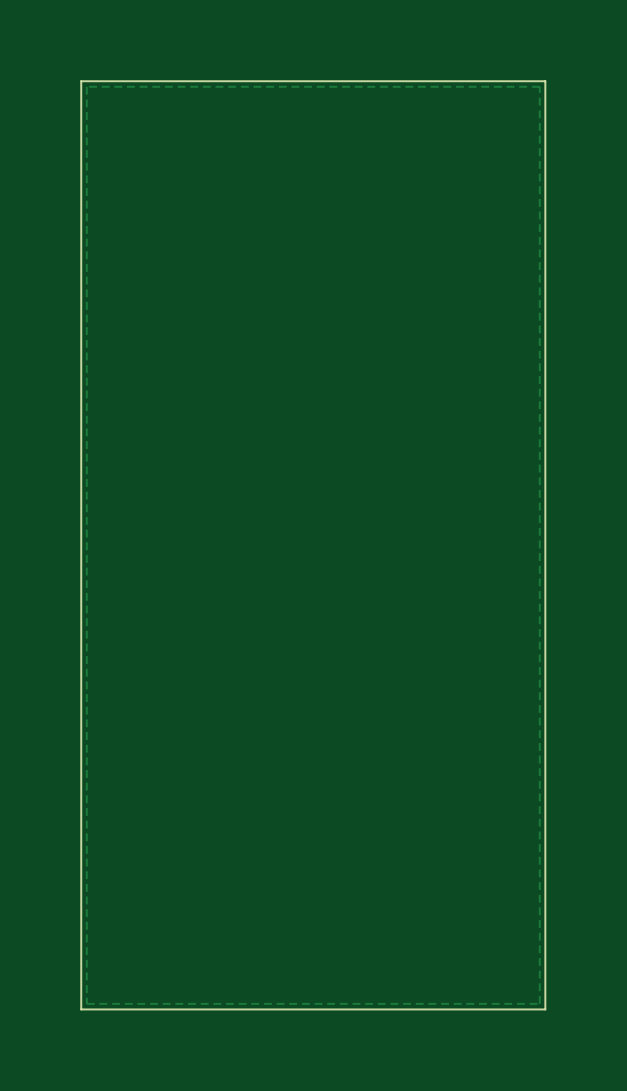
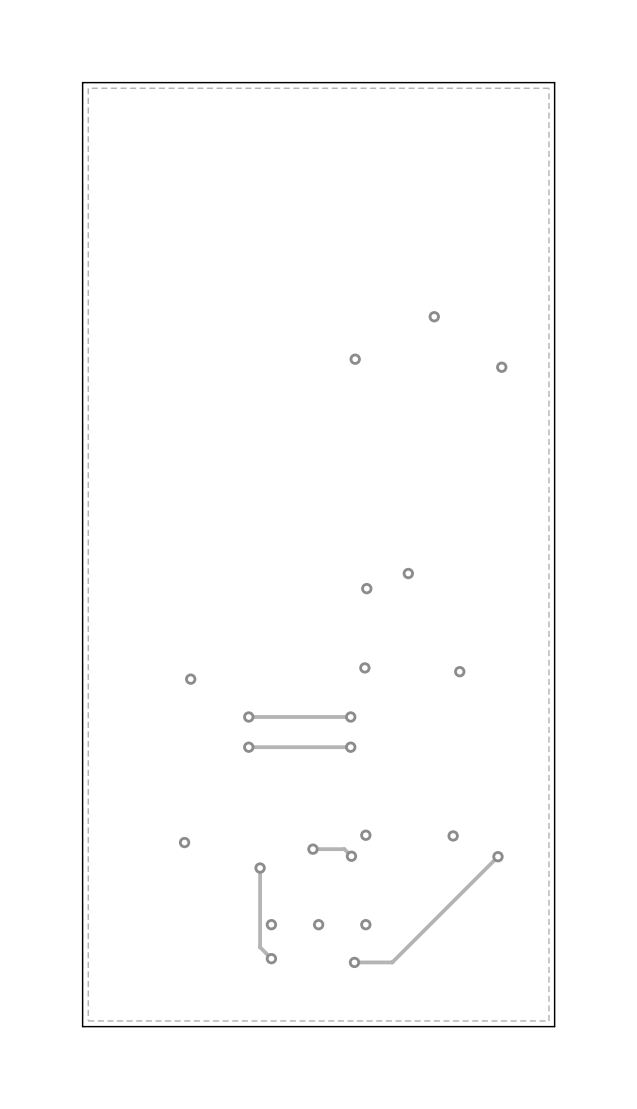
via: none -> (434, 316)
via: none -> (355, 359)
via: none -> (501, 367)
via: none -> (408, 573)
via: none -> (366, 588)
via: none -> (364, 667)
via: none -> (459, 671)
via: none -> (190, 679)
via: none -> (248, 716)
track: none -> (350, 716) (248, 716)
via: none -> (350, 716)
via: none -> (248, 747)
track: none -> (350, 747) (248, 747)
via: none -> (350, 747)
via: none -> (365, 835)
via: none -> (453, 835)
via: none -> (184, 842)
track: none -> (312, 849) (344, 849) (351, 856)
via: none -> (312, 849)
via: none -> (351, 856)
track: none -> (497, 856) (392, 962) (354, 962)
via: none -> (497, 856)
track: none -> (260, 868) (260, 947) (271, 958)
via: none -> (260, 868)
via: none -> (271, 924)
via: none -> (318, 924)
via: none -> (365, 924)
via: none -> (271, 958)
via: none -> (354, 962)

